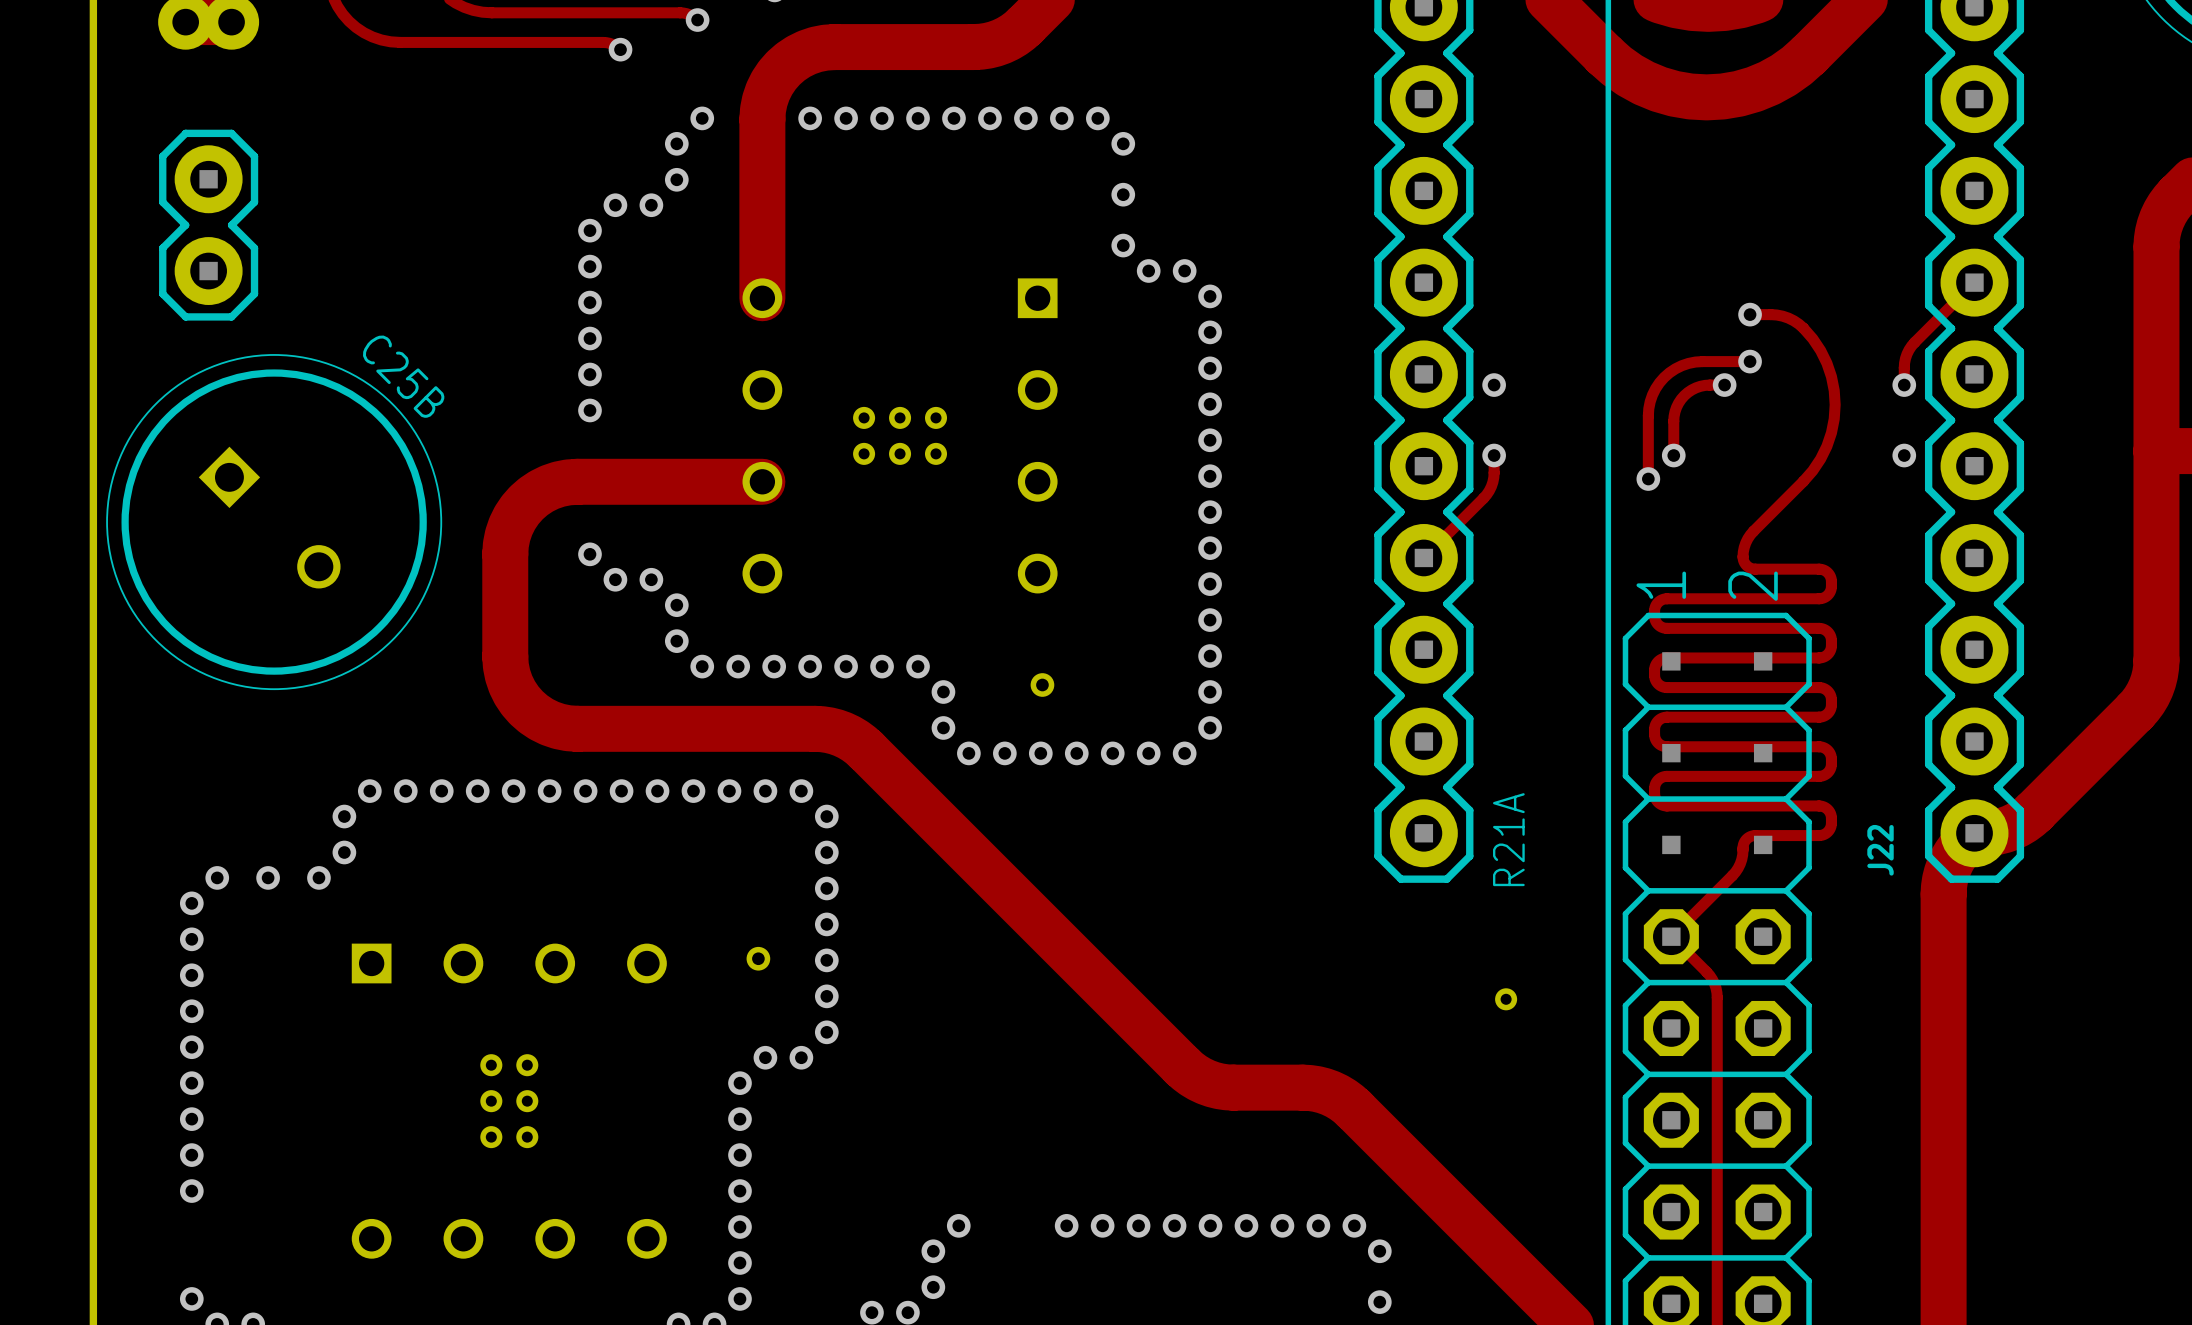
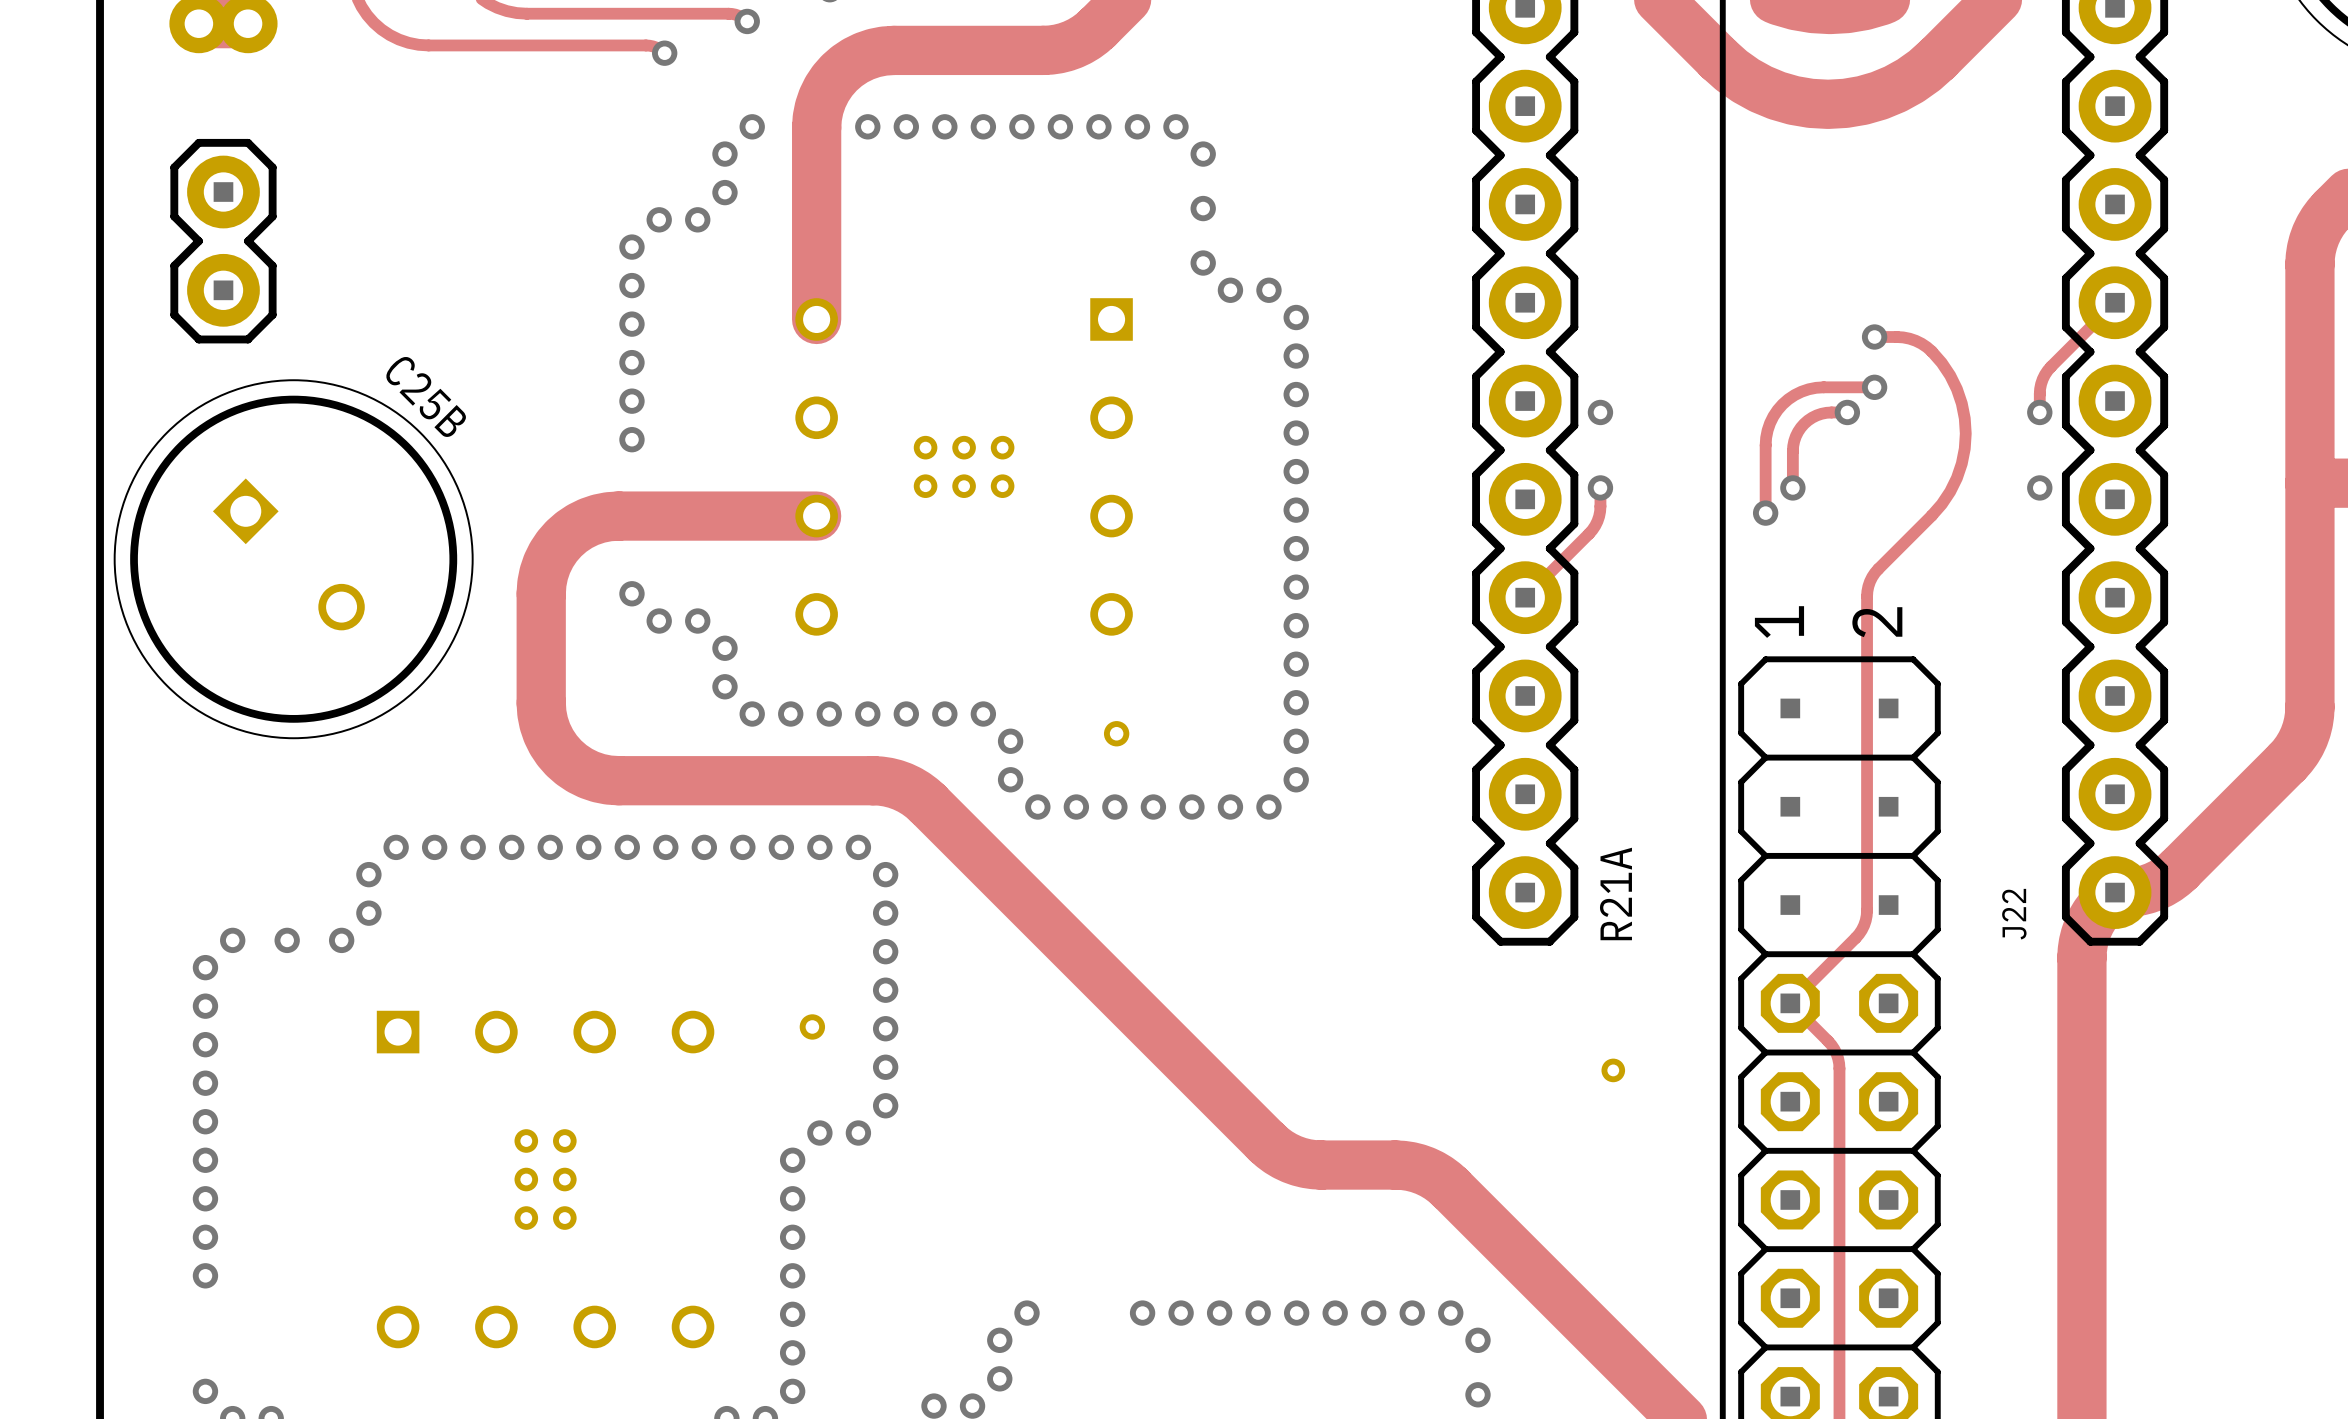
track: (1743, 556) (1745, 564) (1752, 568) (1820, 569) (1827, 572) (1831, 581) (1829, 592) (1820, 598) (1666, 598) (1659, 601) (1654, 607) (1656, 622) (1665, 628) (1819, 628) (1826, 630) (1830, 636) (1830, 650) (1826, 655) (1820, 657) (1666, 657) (1659, 660) (1655, 665) (1655, 679) (1659, 685) (1665, 687) (1819, 687) (1826, 690) (1830, 695) (1830, 709) (1826, 714) (1820, 717) (1666, 717) (1660, 718) (1656, 723) (1655, 739) (1659, 744) (1665, 746) (1819, 746) (1828, 751) (1831, 757) (1831, 767) (1826, 773) (1820, 776) (1666, 776) (1657, 781) (1654, 787) (1654, 796) (1659, 803) (1665, 805) (1819, 805) (1826, 808) (1830, 813) (1831, 826) (1823, 834) (1753, 835) (1745, 840) (1743, 847) -> (1867, 596) (1867, 908)

